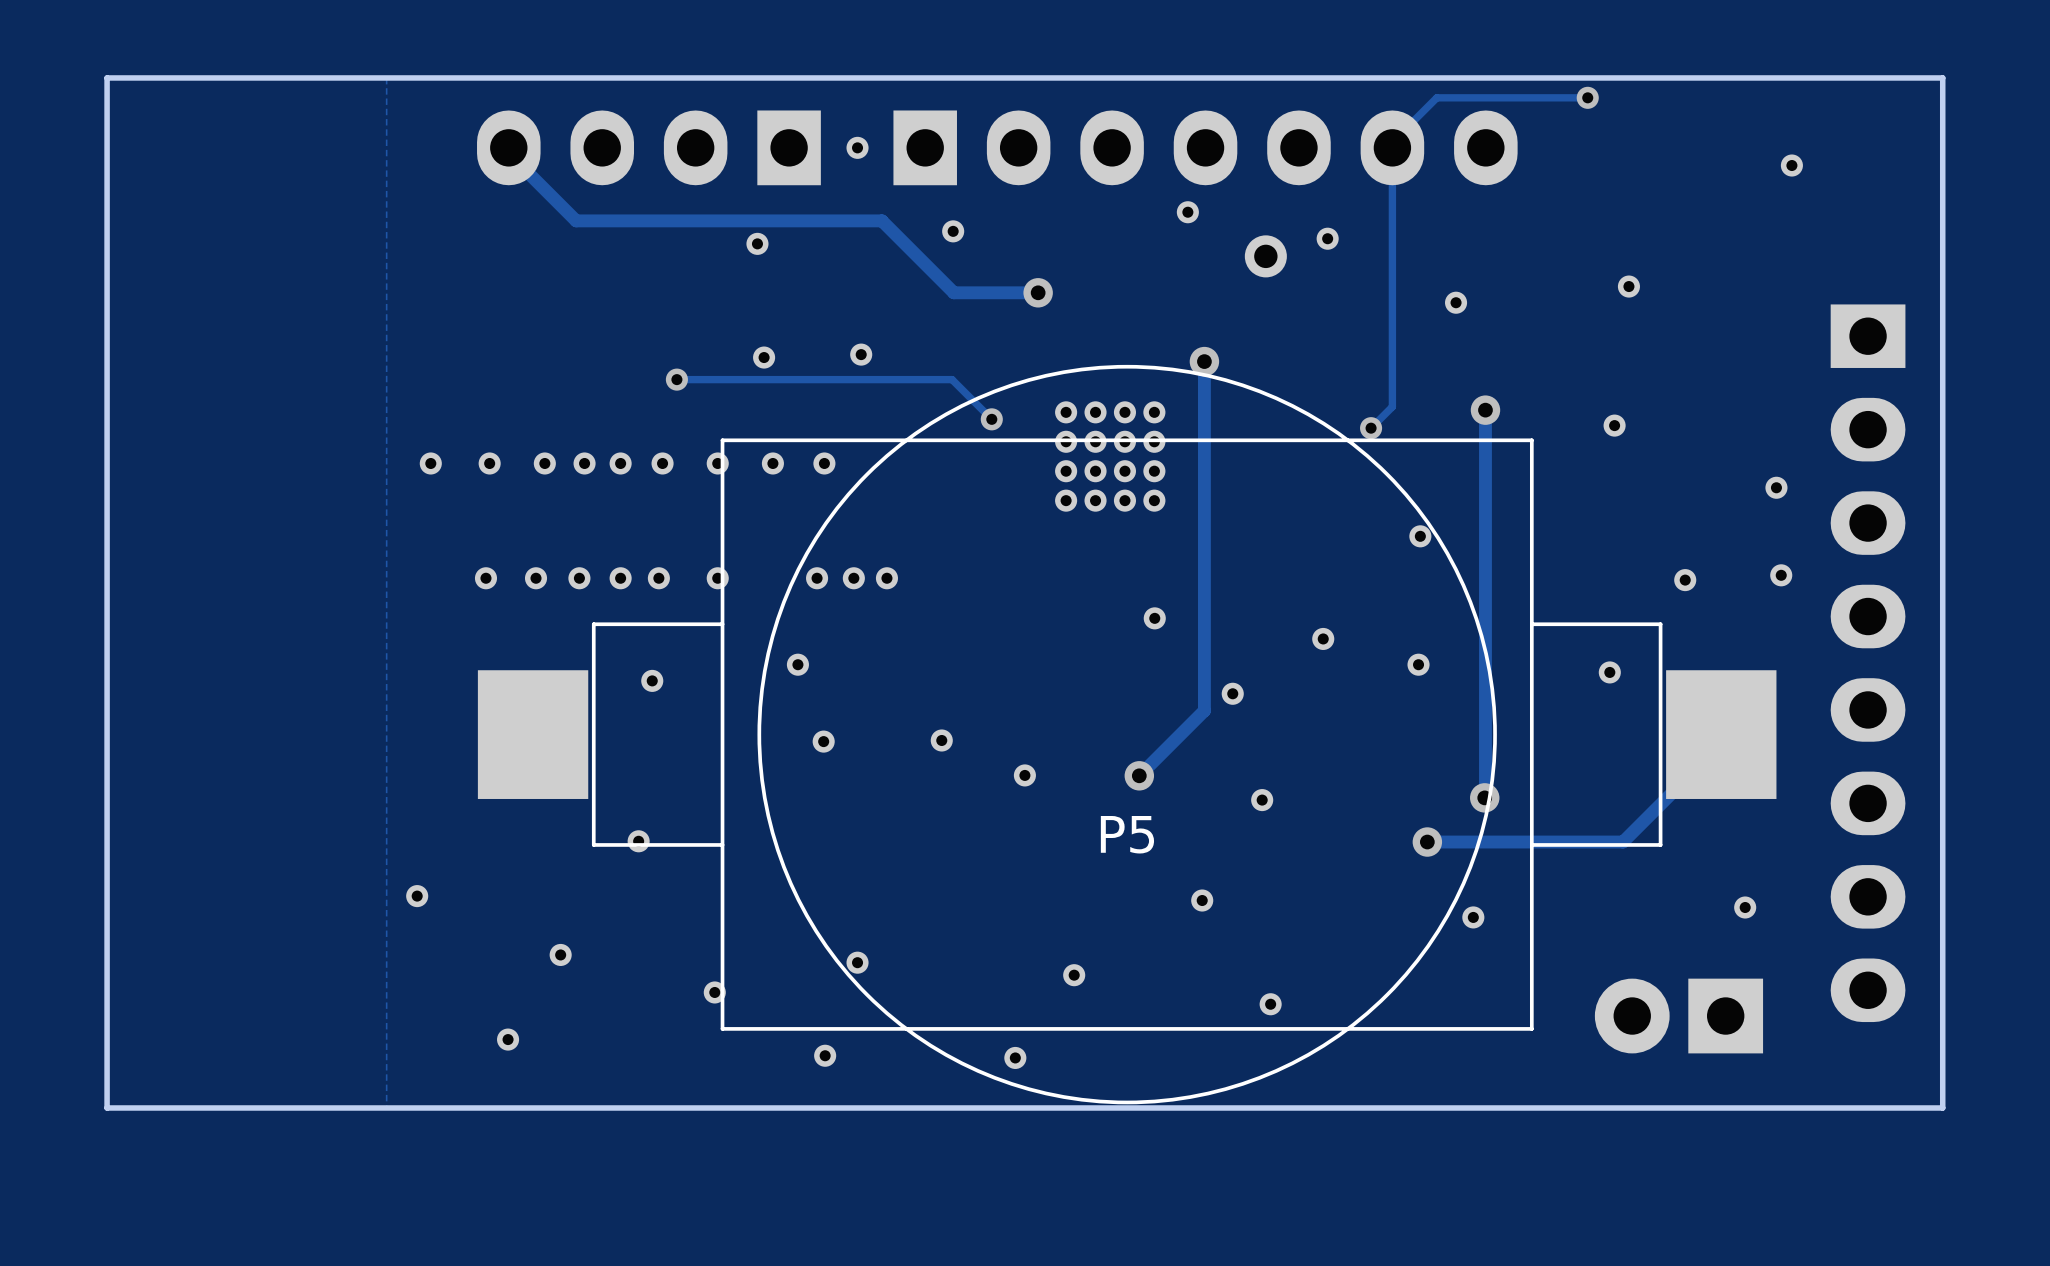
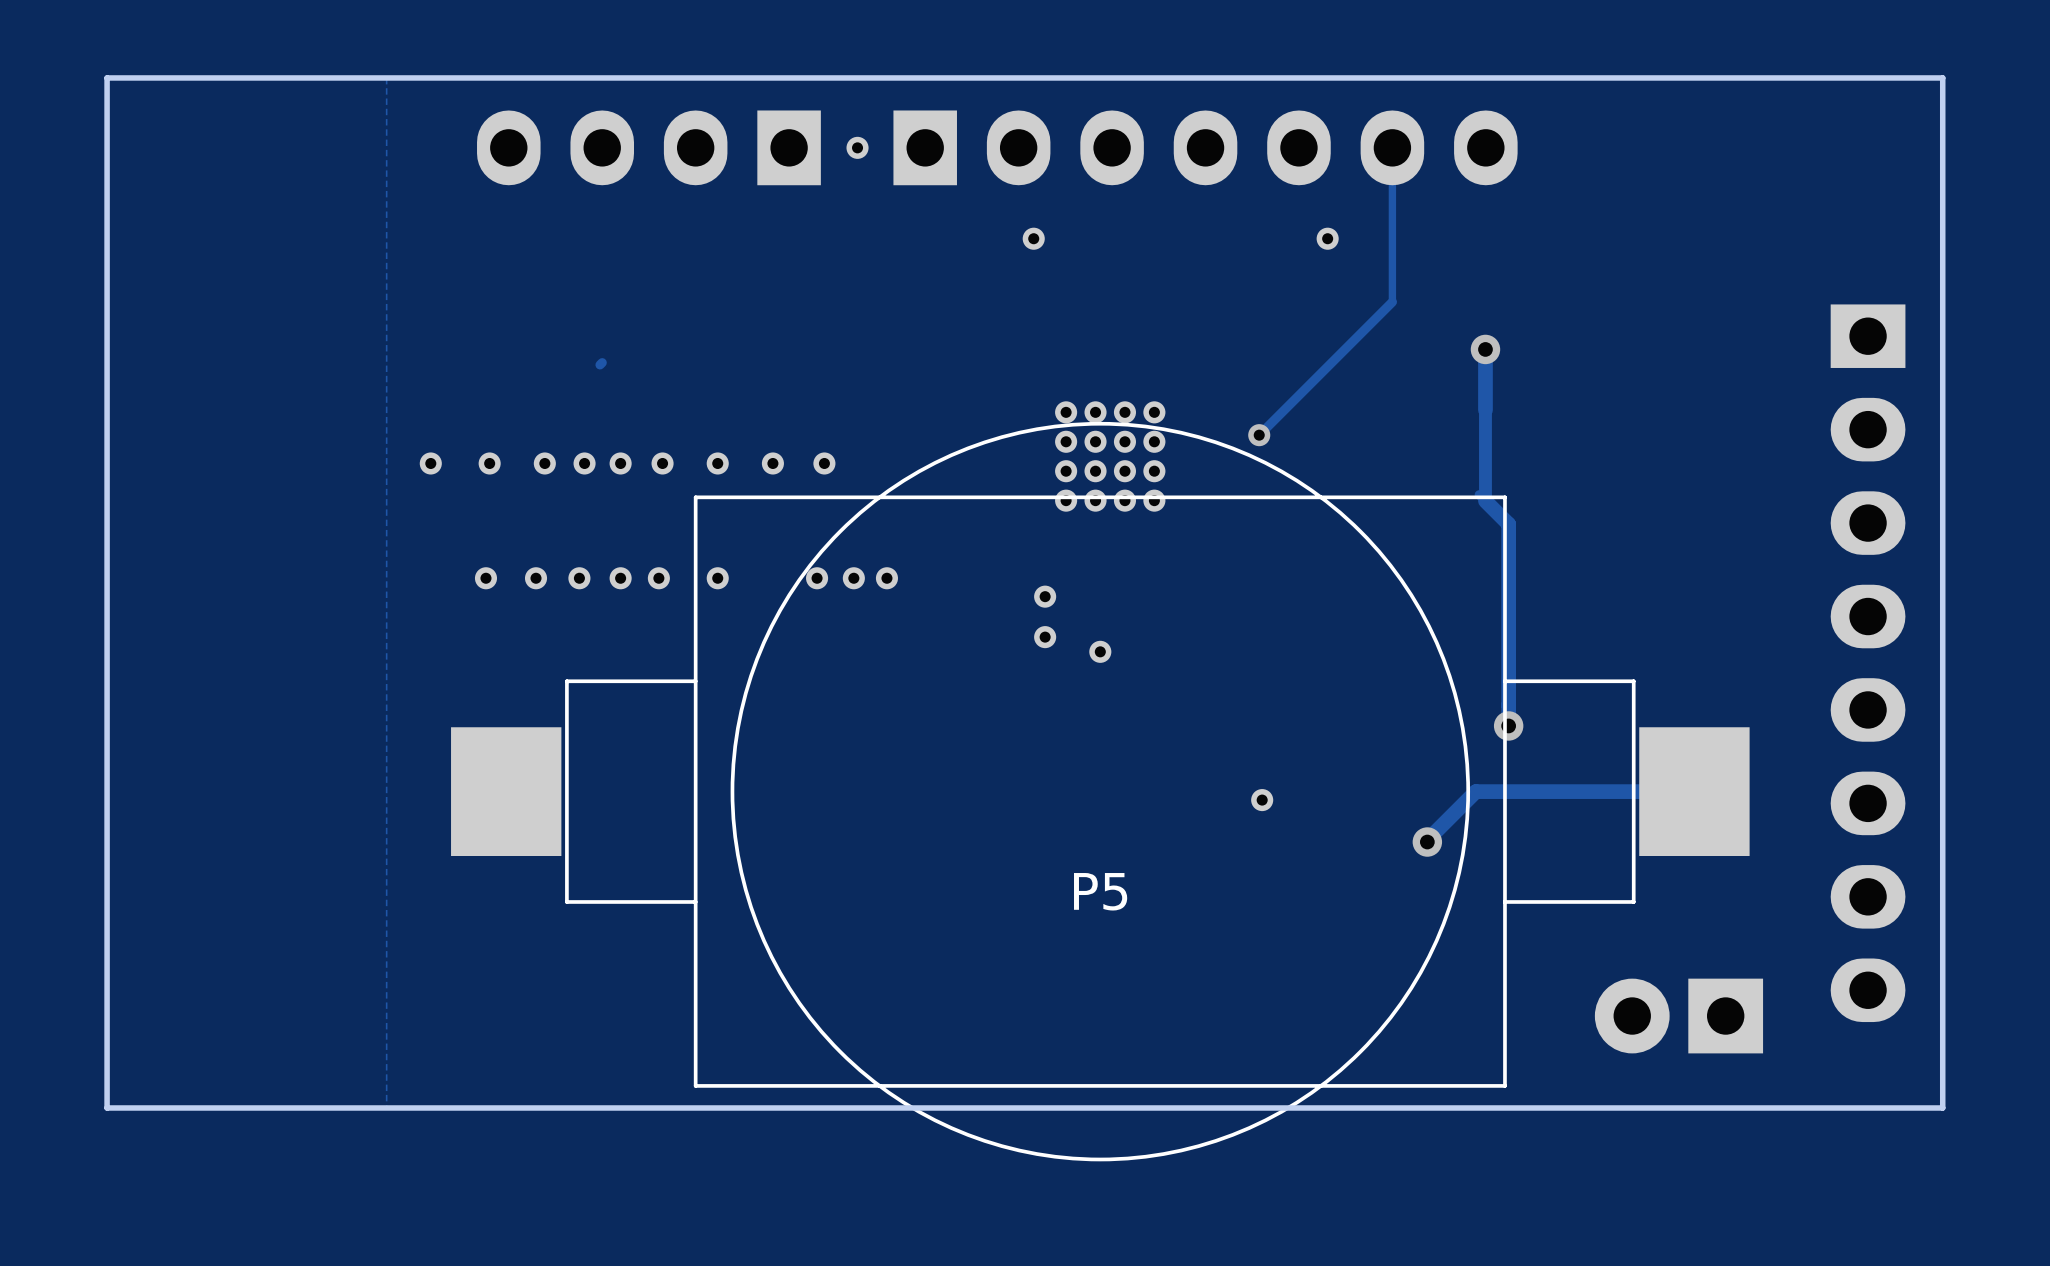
track: (1587, 97) (1436, 97) (1392, 142) (1392, 147) -> none
via: (1587, 97) -> none
track: (508, 147) (508, 153) (576, 220) (881, 220) (953, 292) (1038, 292) -> none
part: (1791, 165) -> none
part: (1187, 212) -> none
part: (953, 231) -> none
part: none -> (1033, 238)
part: (757, 243) -> none
part: (1265, 256) -> none
part: (1628, 286) -> none
via: (1038, 292) -> none
track: (1392, 301) (1392, 406) (1371, 428) -> (1392, 301) (1259, 435)
part: (1456, 302) -> none
track: none -> (1485, 349) (1485, 410)
part: (861, 354) -> none
part: (764, 357) -> none
track: (1204, 361) (1204, 710) (1139, 775) -> none
via: (1204, 361) -> none
track: none -> (602, 362) (600, 364)
track: (676, 379) (952, 379) (991, 419) -> none
via: (676, 379) -> none
via position: (1485, 410) -> (1485, 349)
via: (991, 419) -> none
part: (1614, 425) -> none
via position: (1371, 428) -> (1259, 435)
part: (1776, 487) -> none
track: none -> (1479, 494) (1508, 524) (1508, 725)
track: (1485, 501) (1484, 797) -> none
part: (1420, 536) -> none
part: (1781, 575) -> none
part: (1685, 580) -> none
part: none -> (1045, 596)
part: (1154, 618) -> none
part: none -> (1045, 637)
part: (1323, 638) -> none
part: none -> (1100, 651)
part: (797, 664) -> none
part: (1418, 664) -> none
part: (1609, 672) -> none
part: (652, 680) -> none
part: (1232, 693) -> none
P5 position: (1127, 734) -> (1100, 791)
track: (1721, 734) (1721, 743) (1623, 842) (1427, 842) -> none
part: (941, 740) -> none
part: (823, 741) -> none
part: (1024, 775) -> none
via: (1139, 775) -> none
track: none -> (1694, 791) (1475, 791) (1427, 839)
via position: (1484, 797) -> (1508, 725)
part: (638, 841) -> none
part: (417, 896) -> none
part: (1202, 900) -> none
part: (1745, 907) -> none
part: (1473, 917) -> none
part: (560, 954) -> none
part: (857, 962) -> none
part: (1074, 975) -> none
part: (714, 992) -> none
part: (1270, 1004) -> none
part: (508, 1039) -> none
part: (825, 1055) -> none
part: (1015, 1057) -> none

